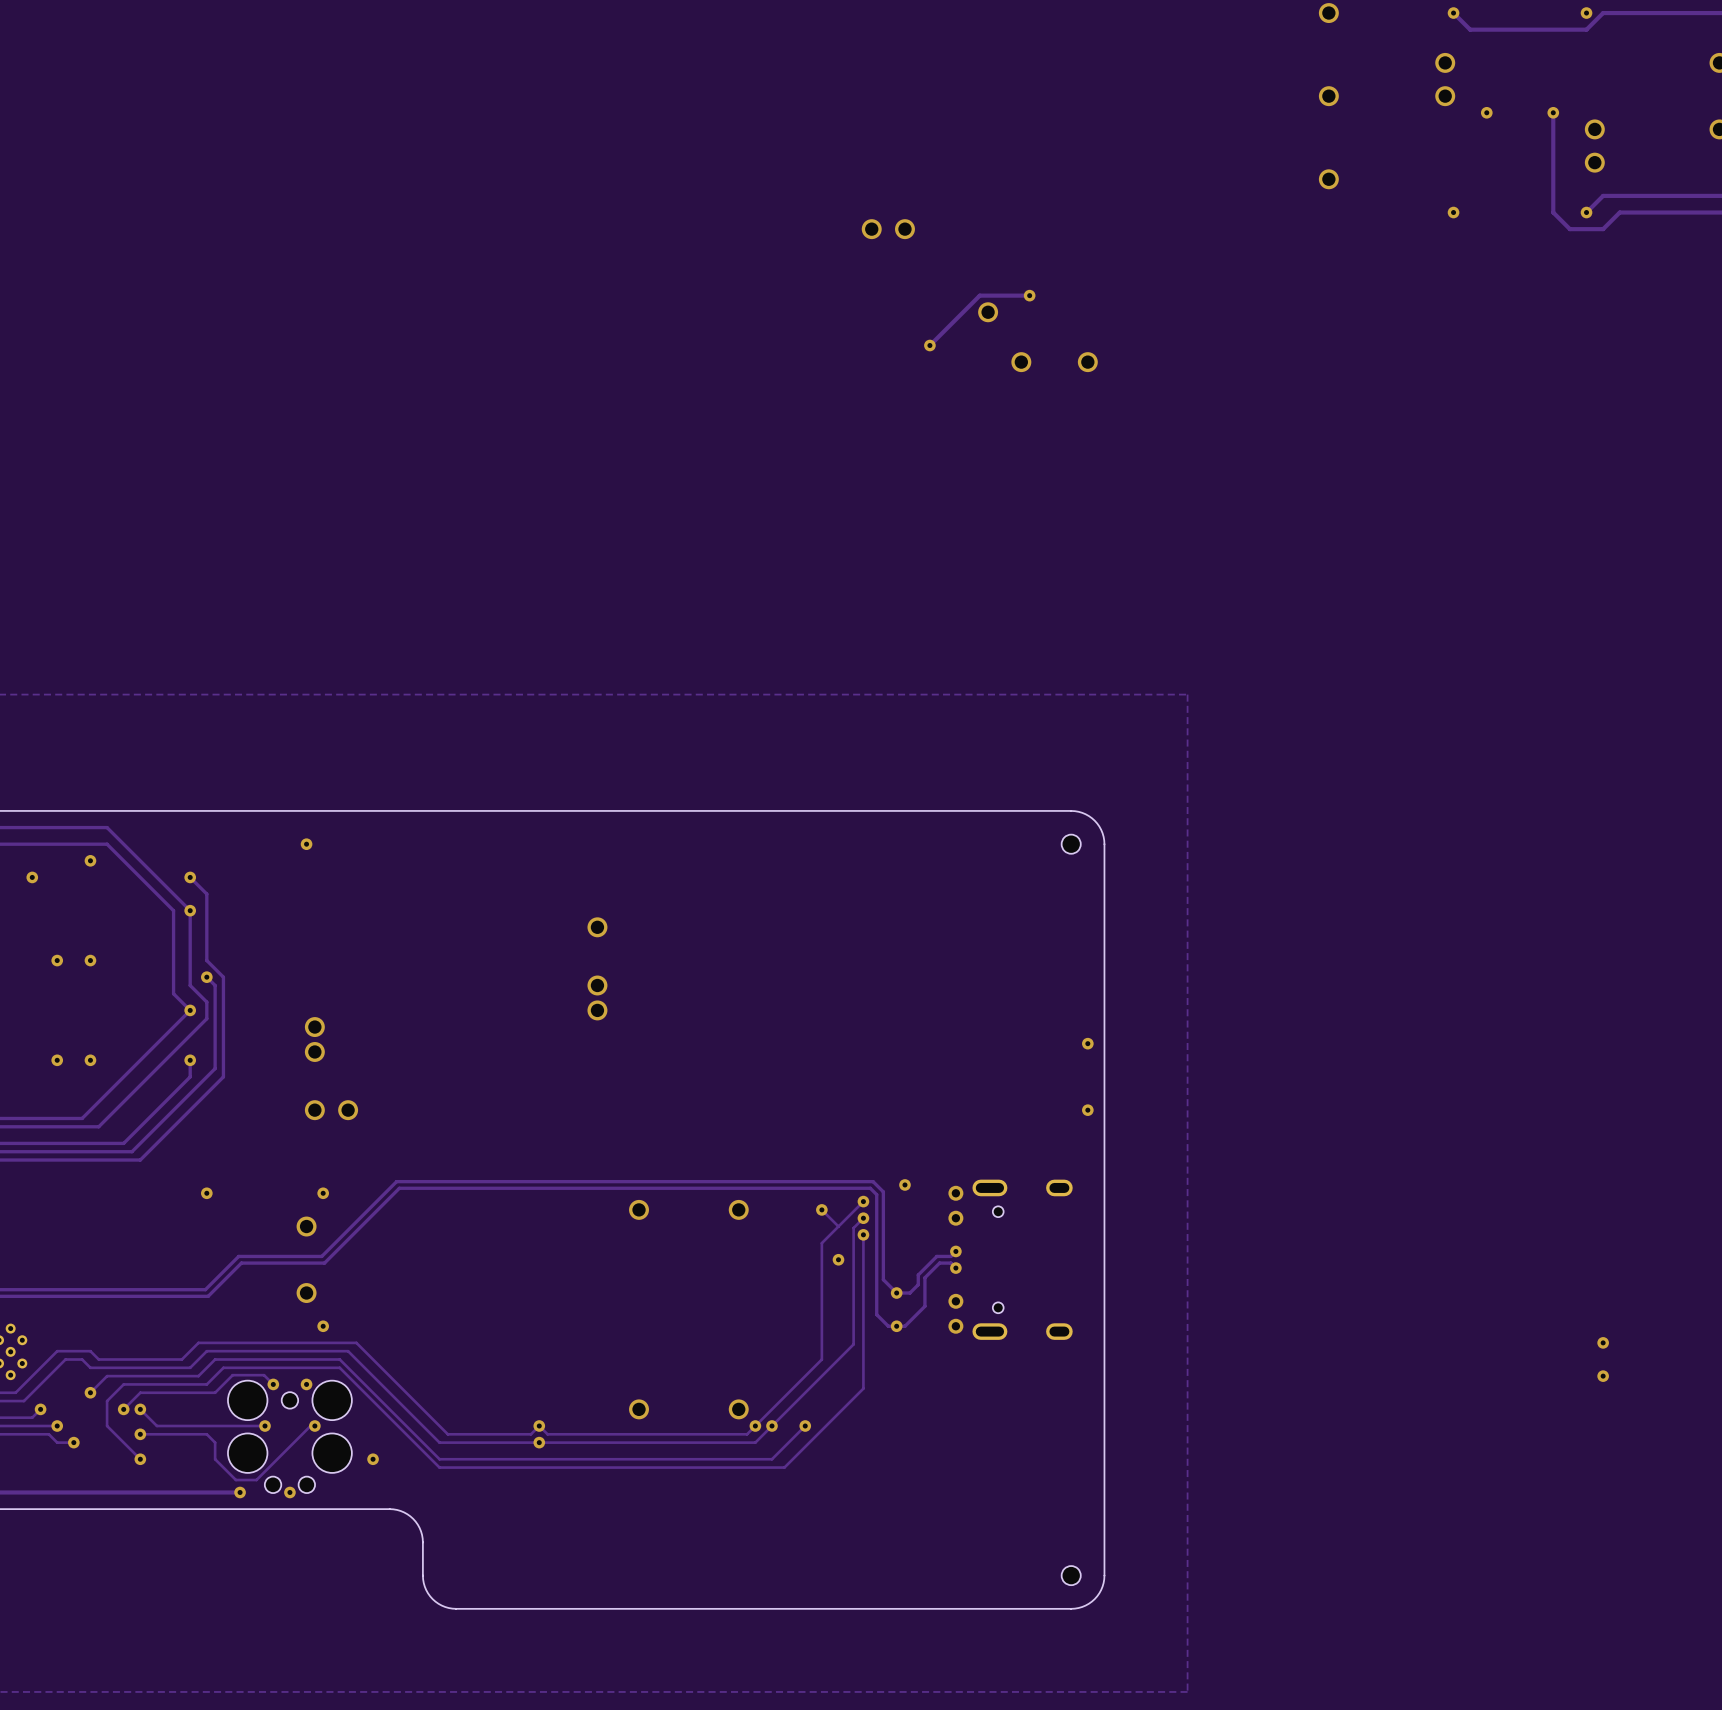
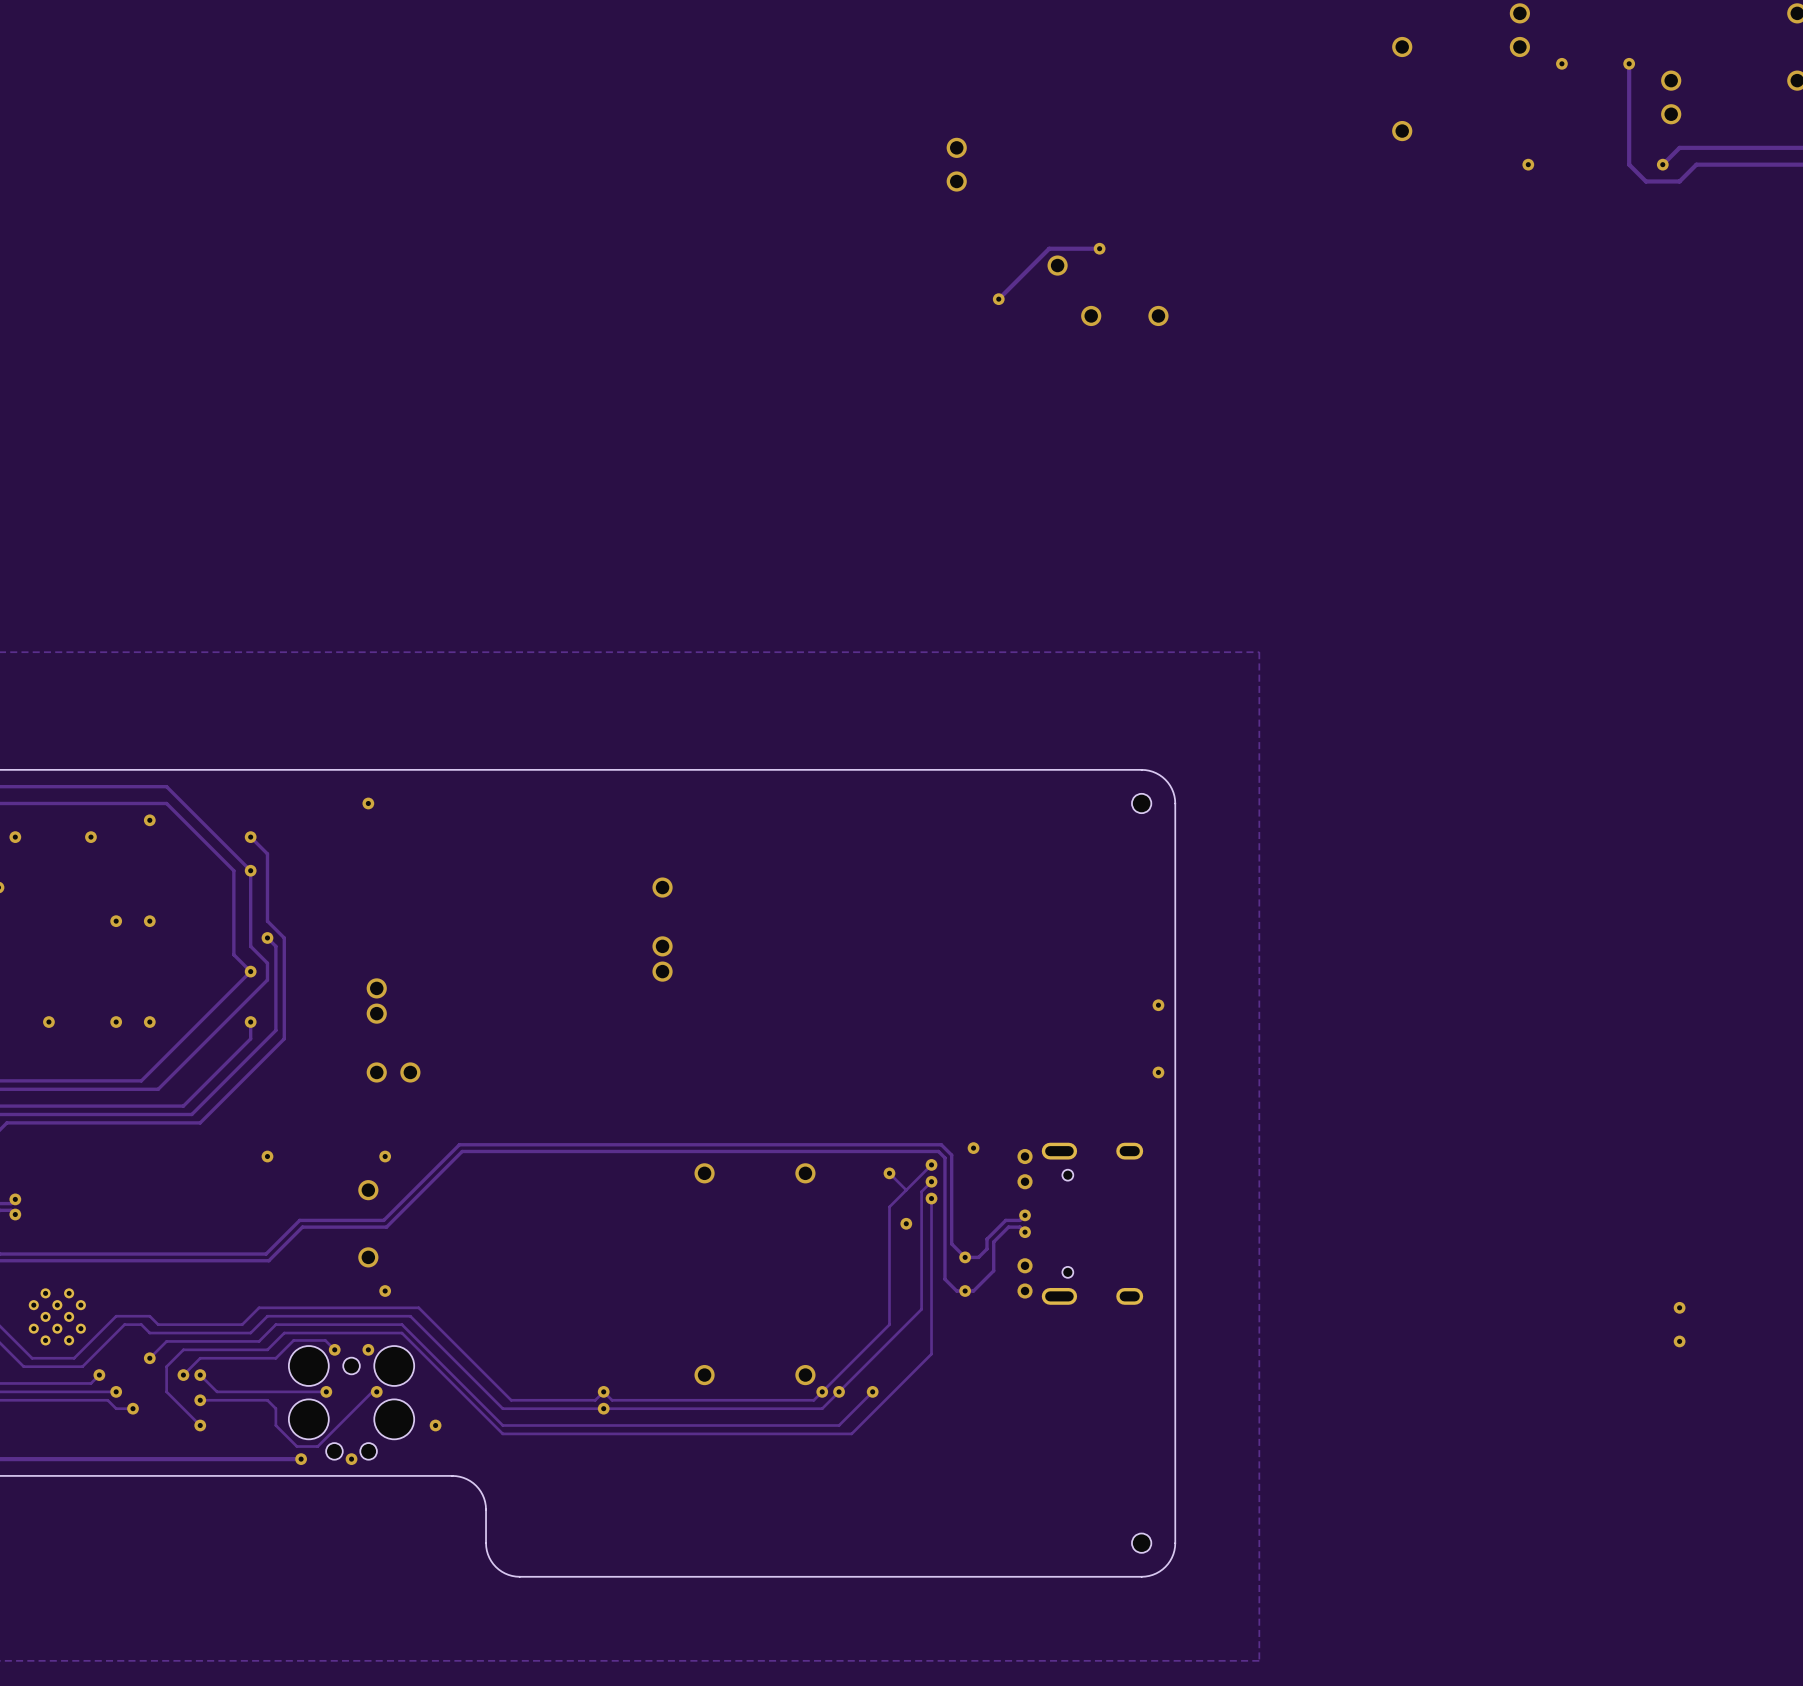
via: none -> (956, 147)
via: (871, 229) -> none
via: none -> (956, 181)
via: (904, 229) -> none

